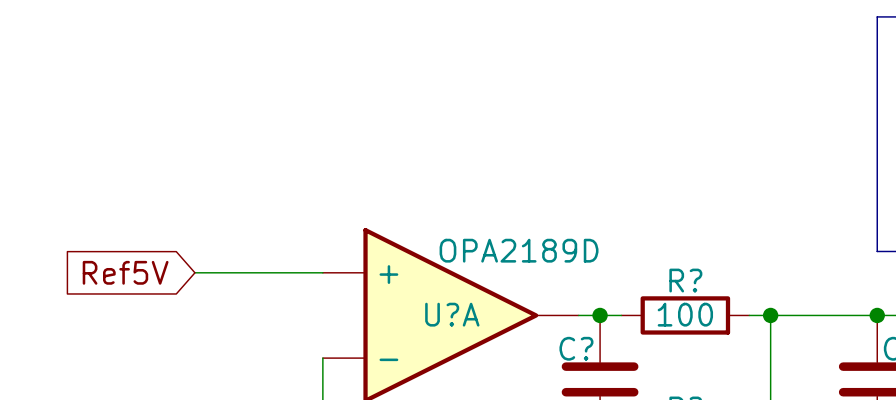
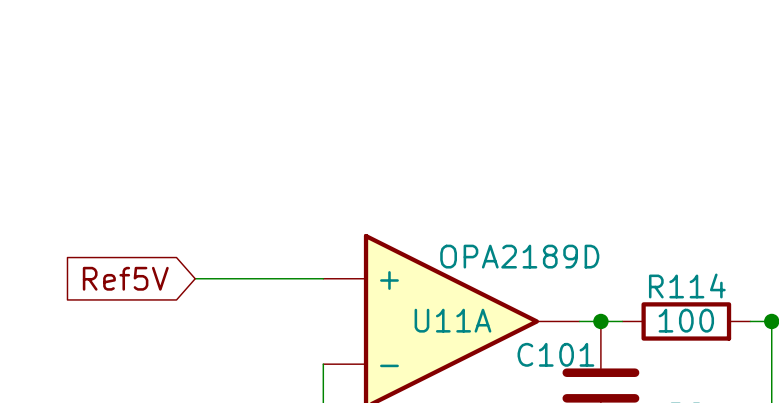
R? name: R? (685, 280) -> R114 (687, 285)
U?A name: U?A (452, 314) -> U11A (452, 320)
C? name: C? (576, 348) -> C101 (555, 354)

